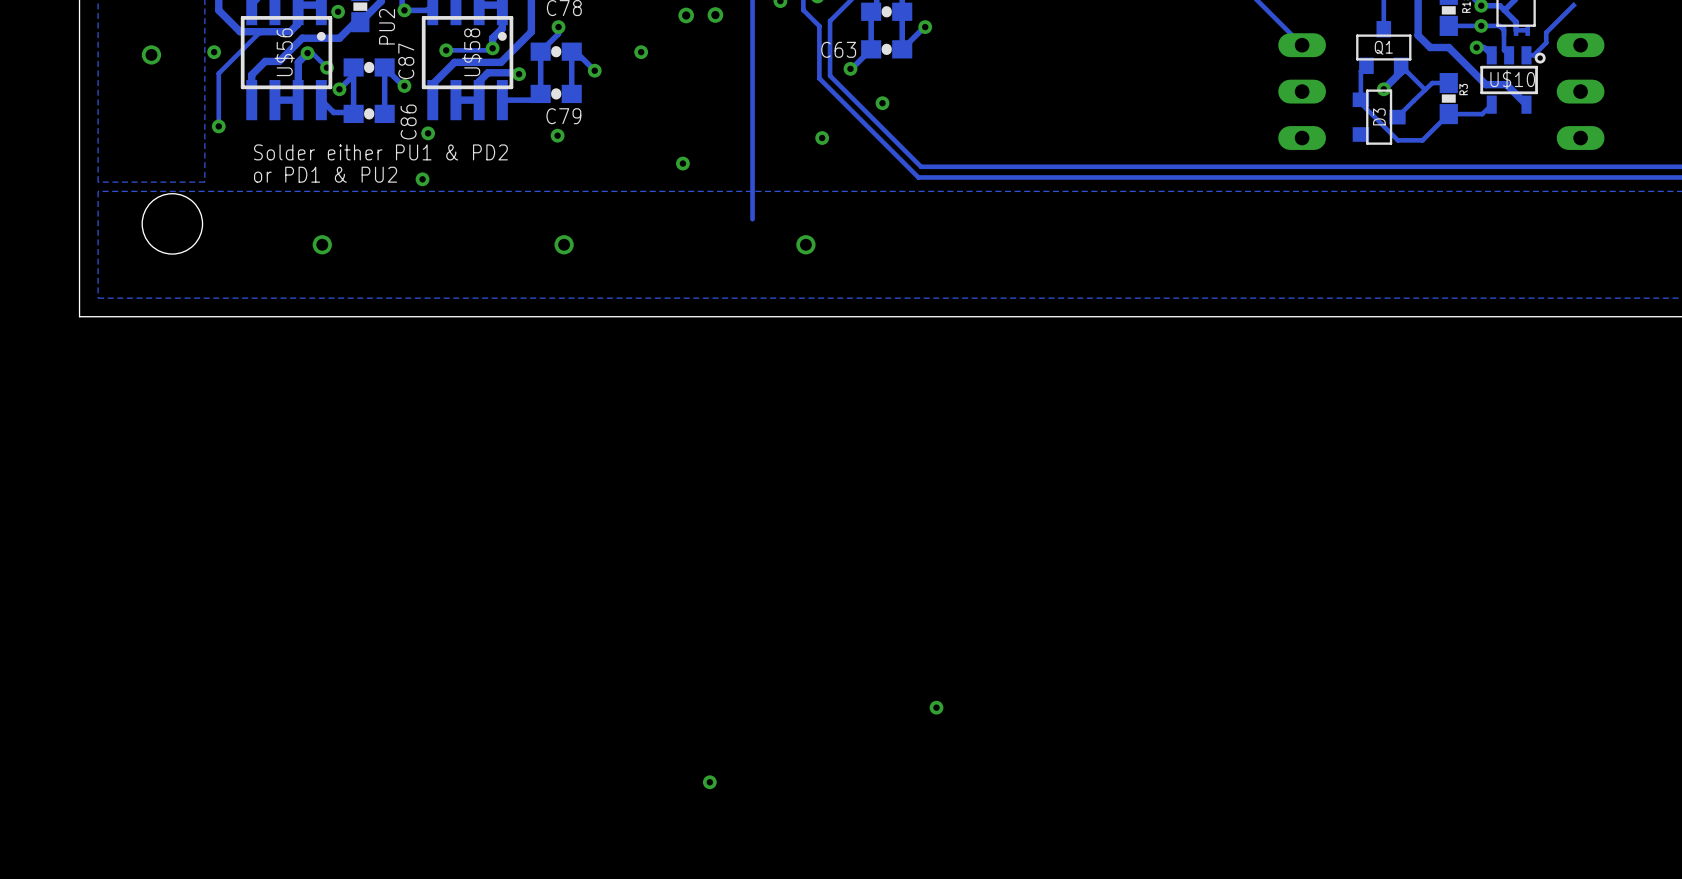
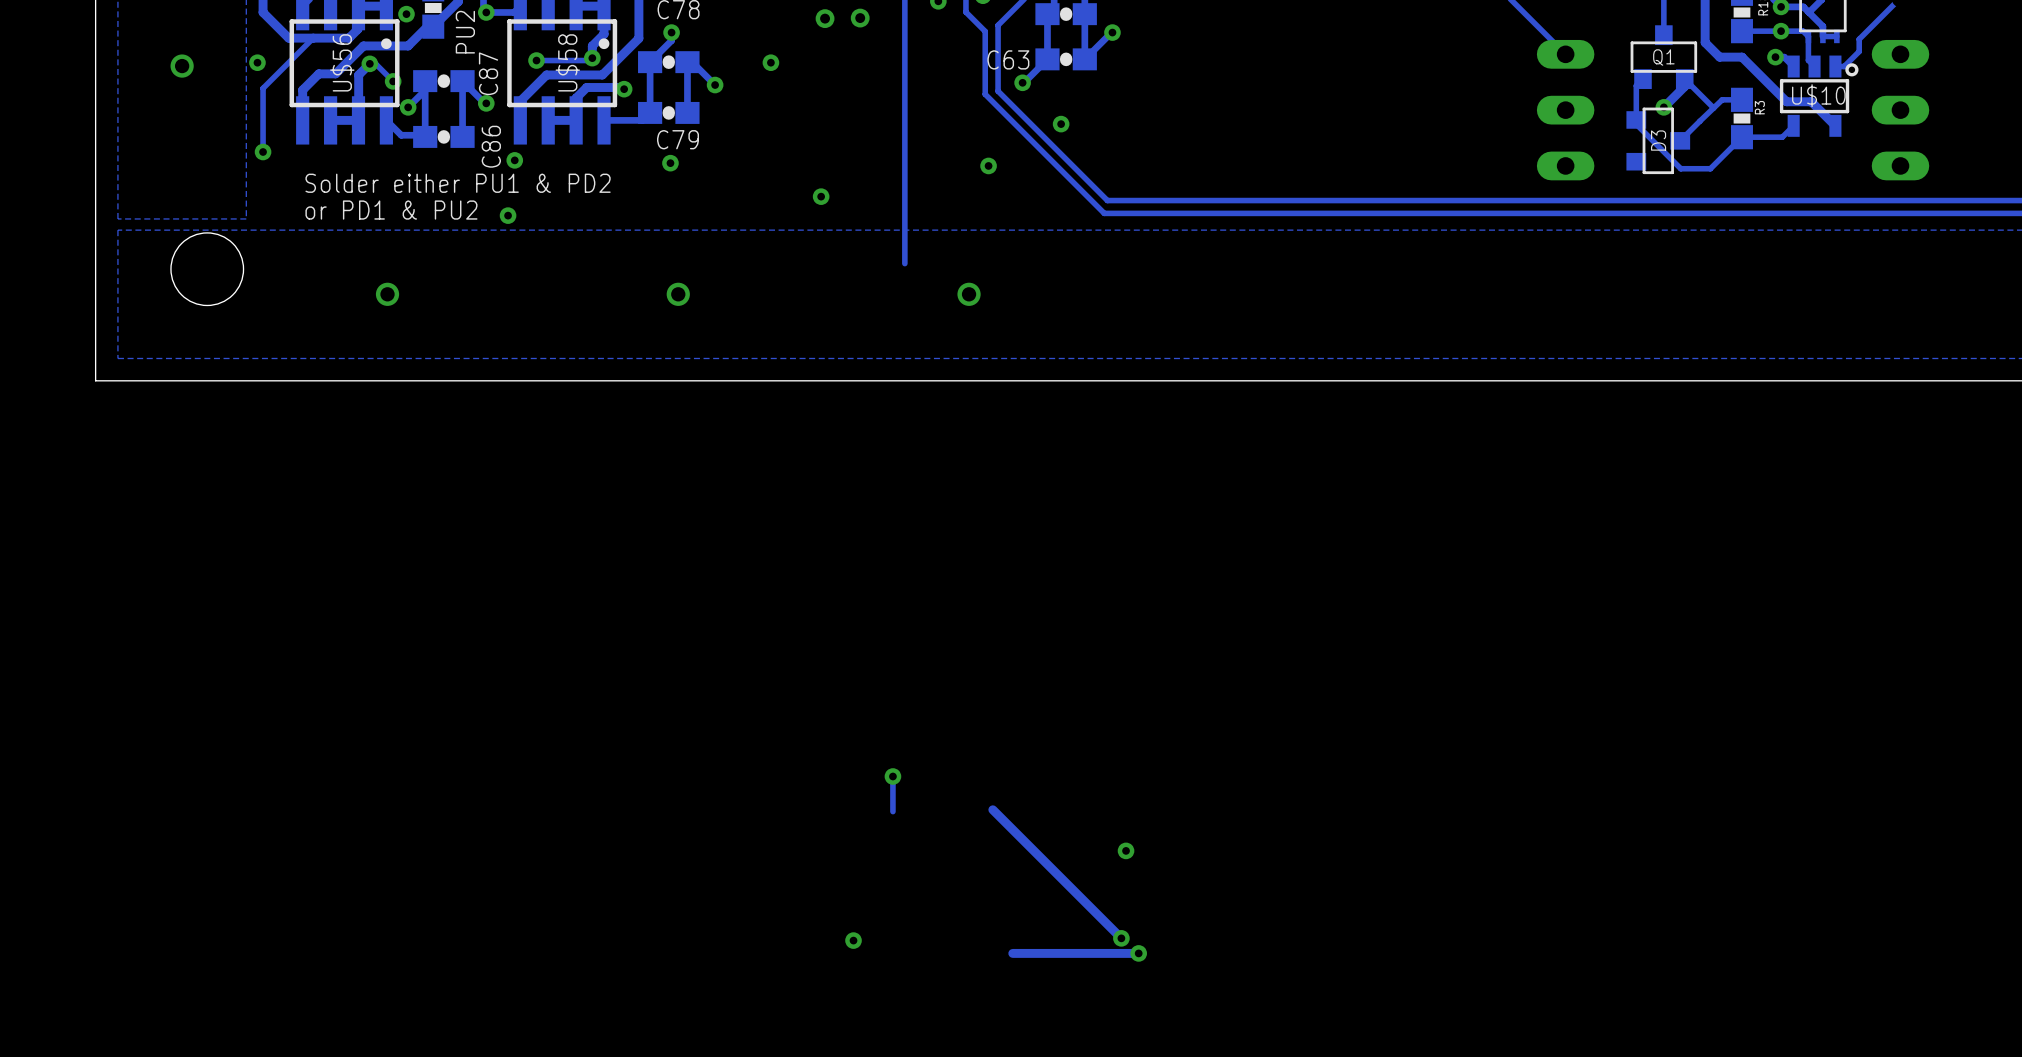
track: none -> (892, 776) (892, 811)
via: none -> (892, 776)
track: none -> (992, 809) (1121, 938)
via: none -> (1121, 938)
track: none -> (1138, 953) (1012, 953)
via: none -> (1138, 953)

